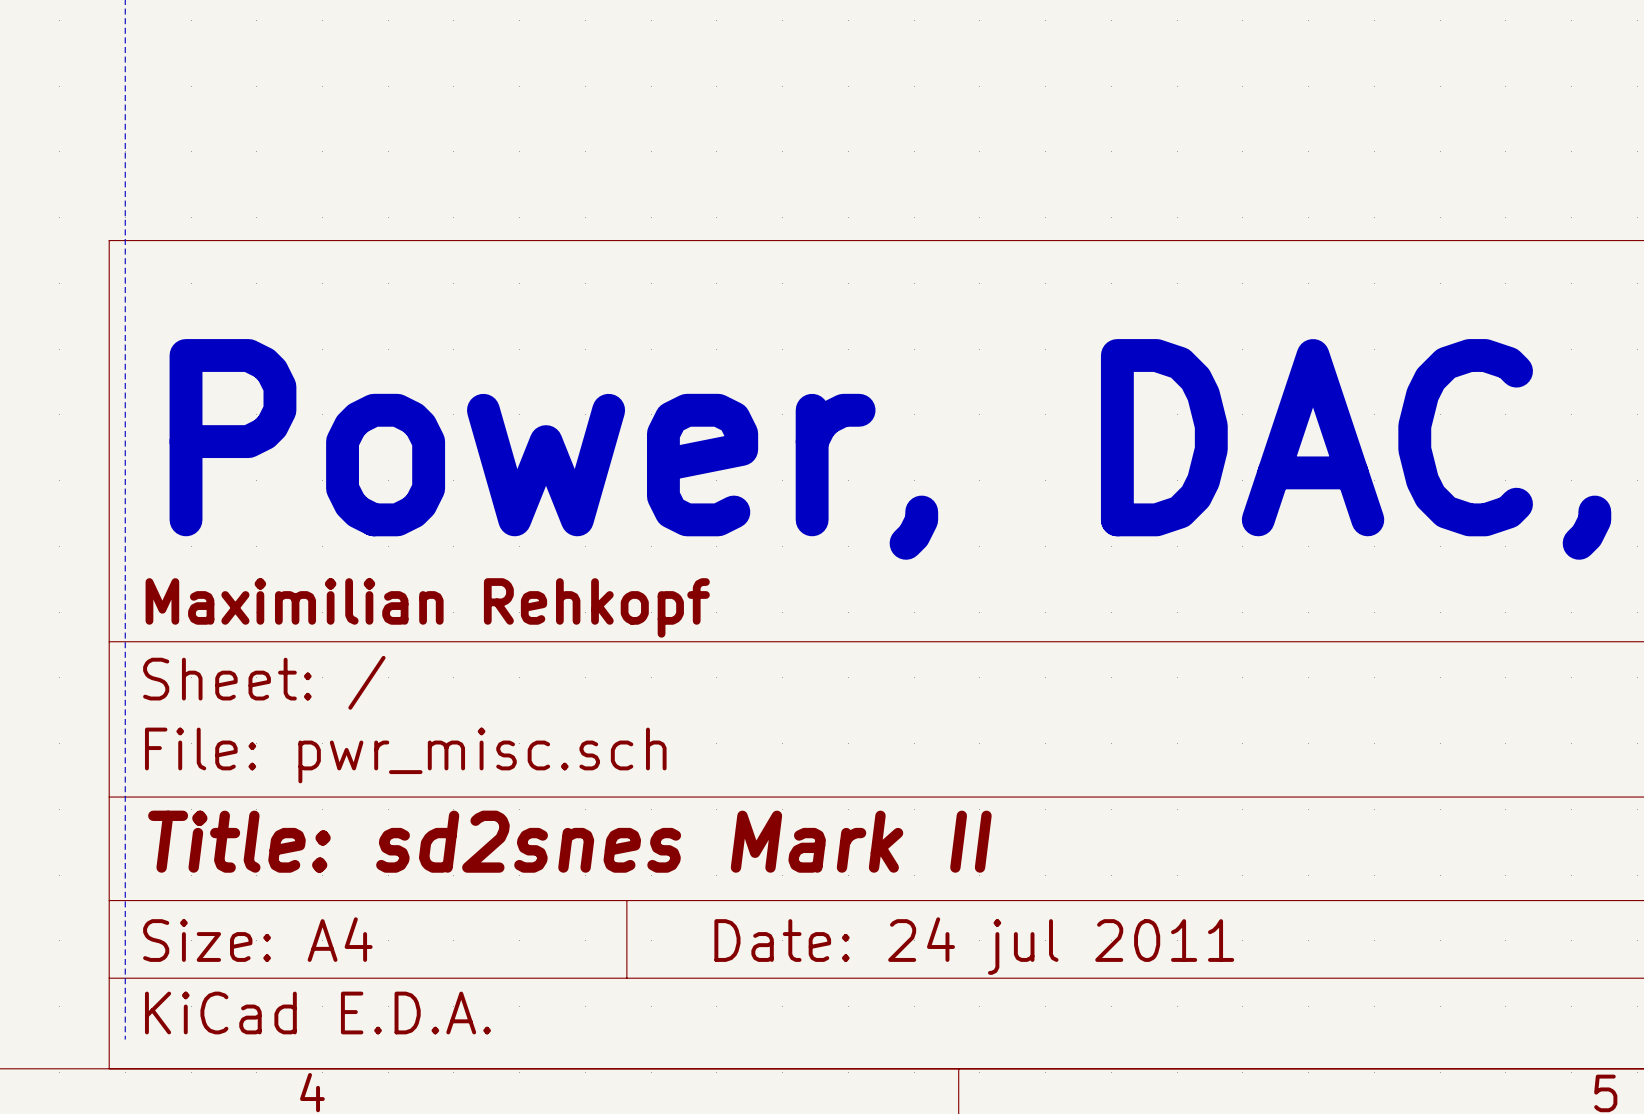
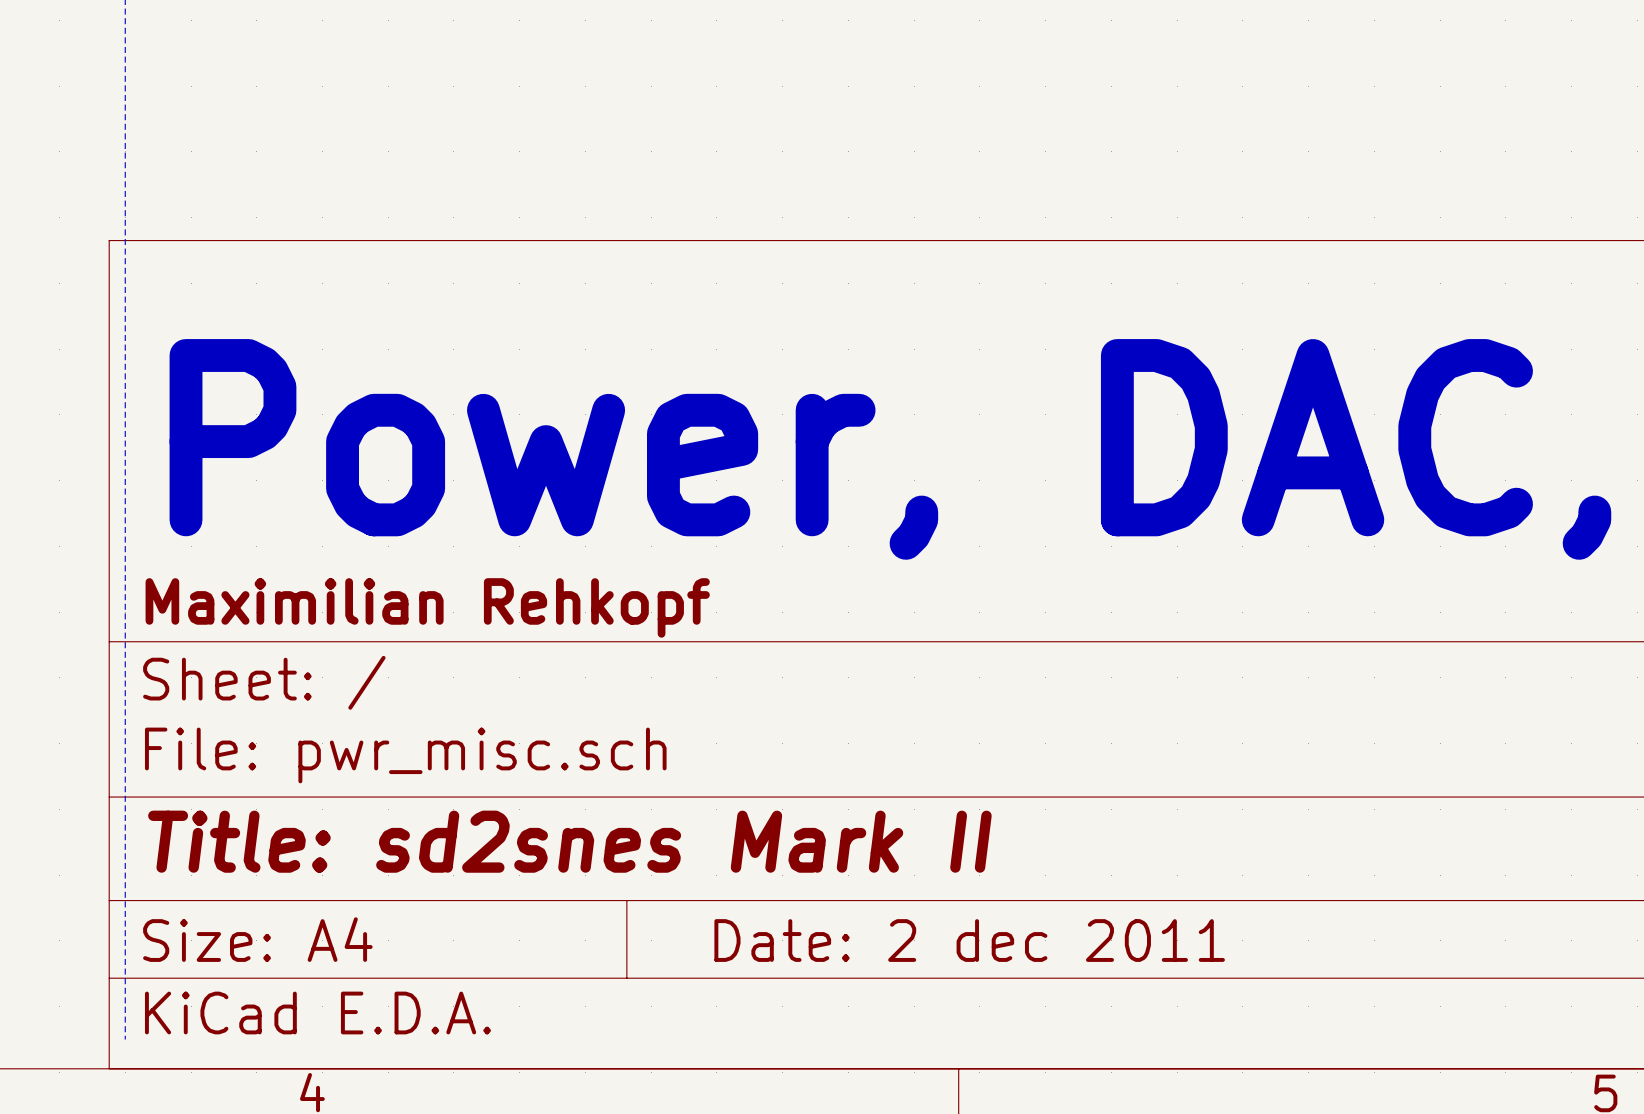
title block: Date: 24 jul 2011 (974, 946) -> Date: 2 dec 2011 (969, 940)

